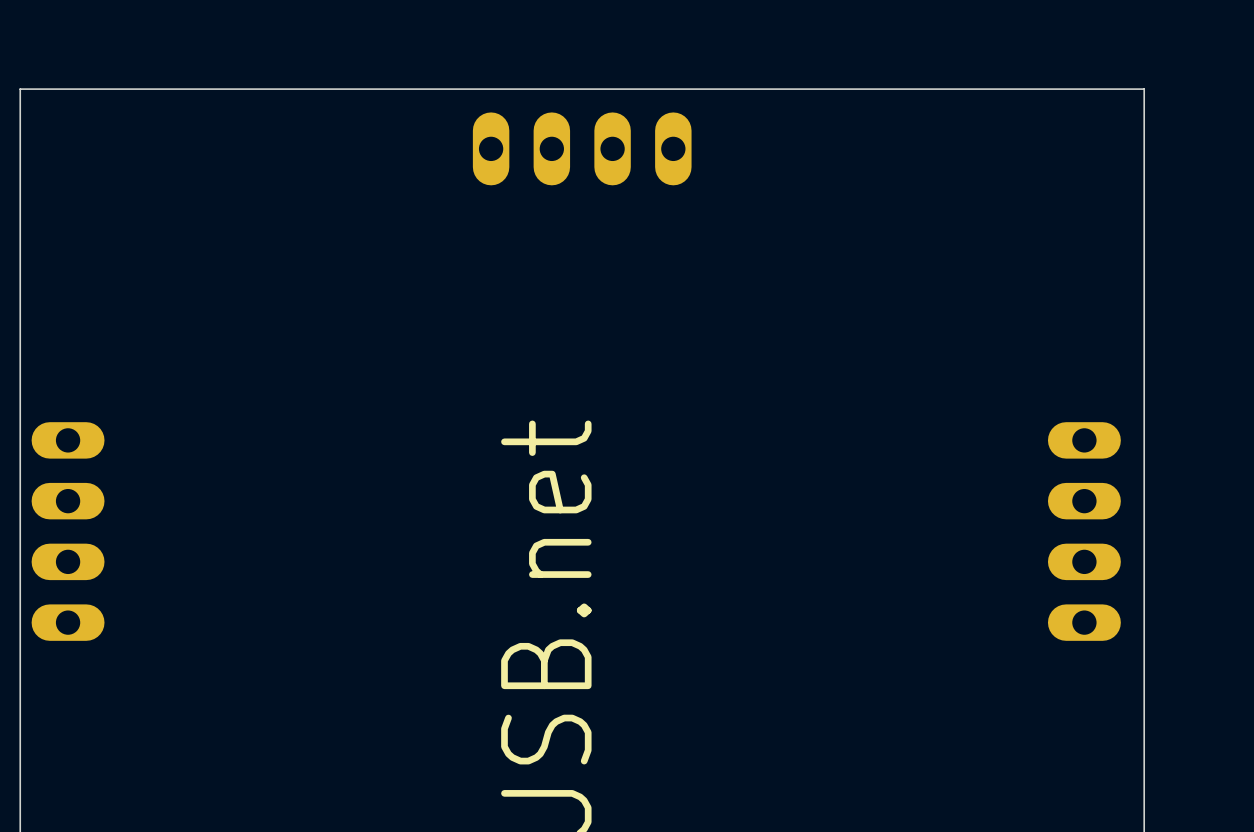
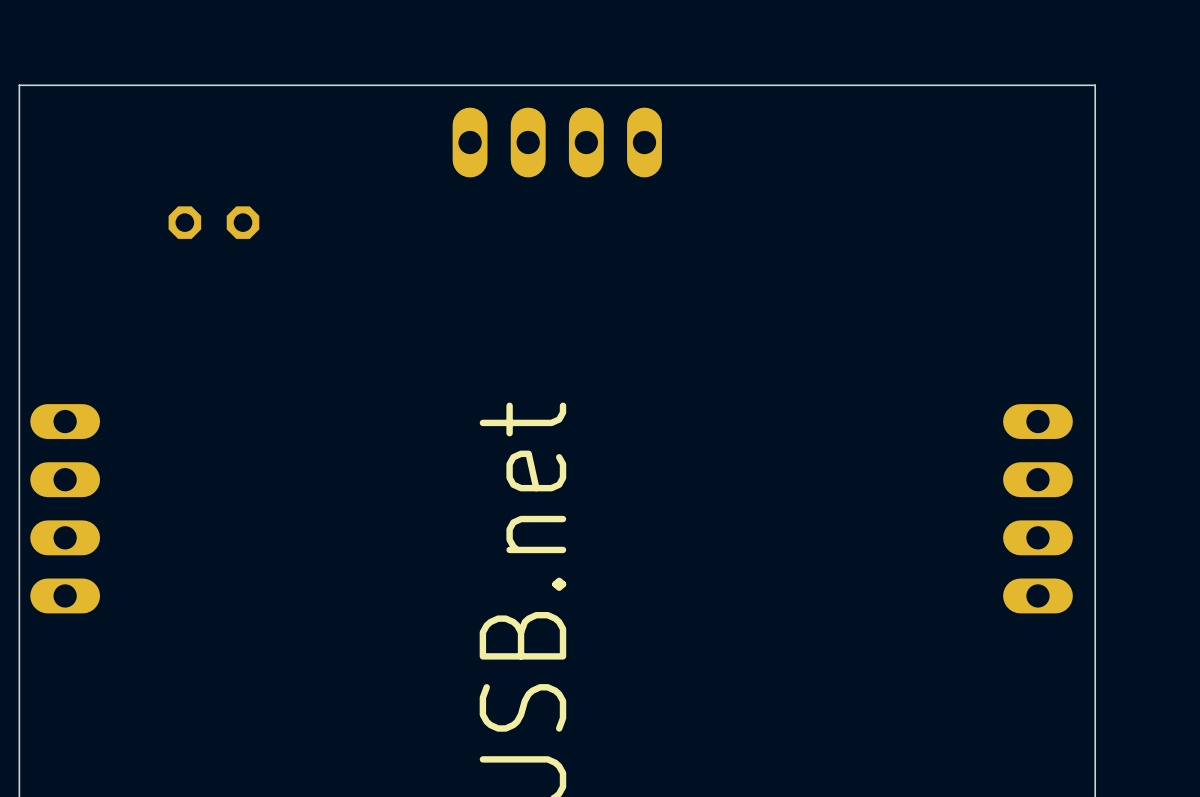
part: none -> (213, 222)

